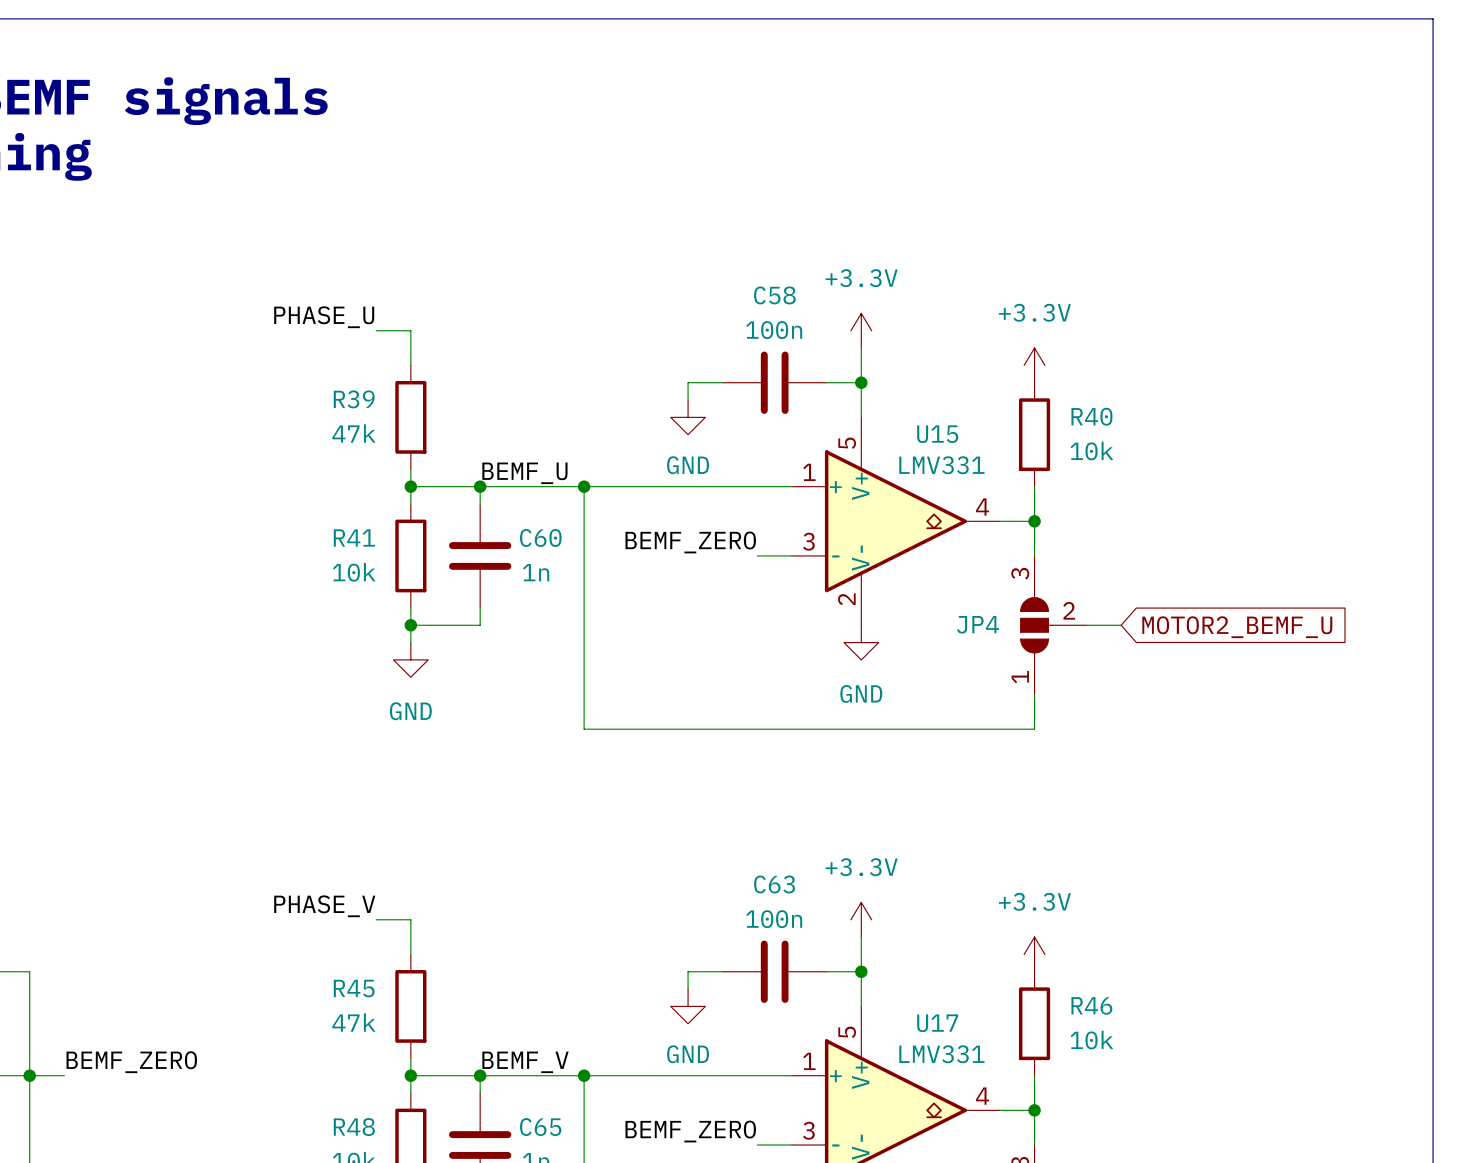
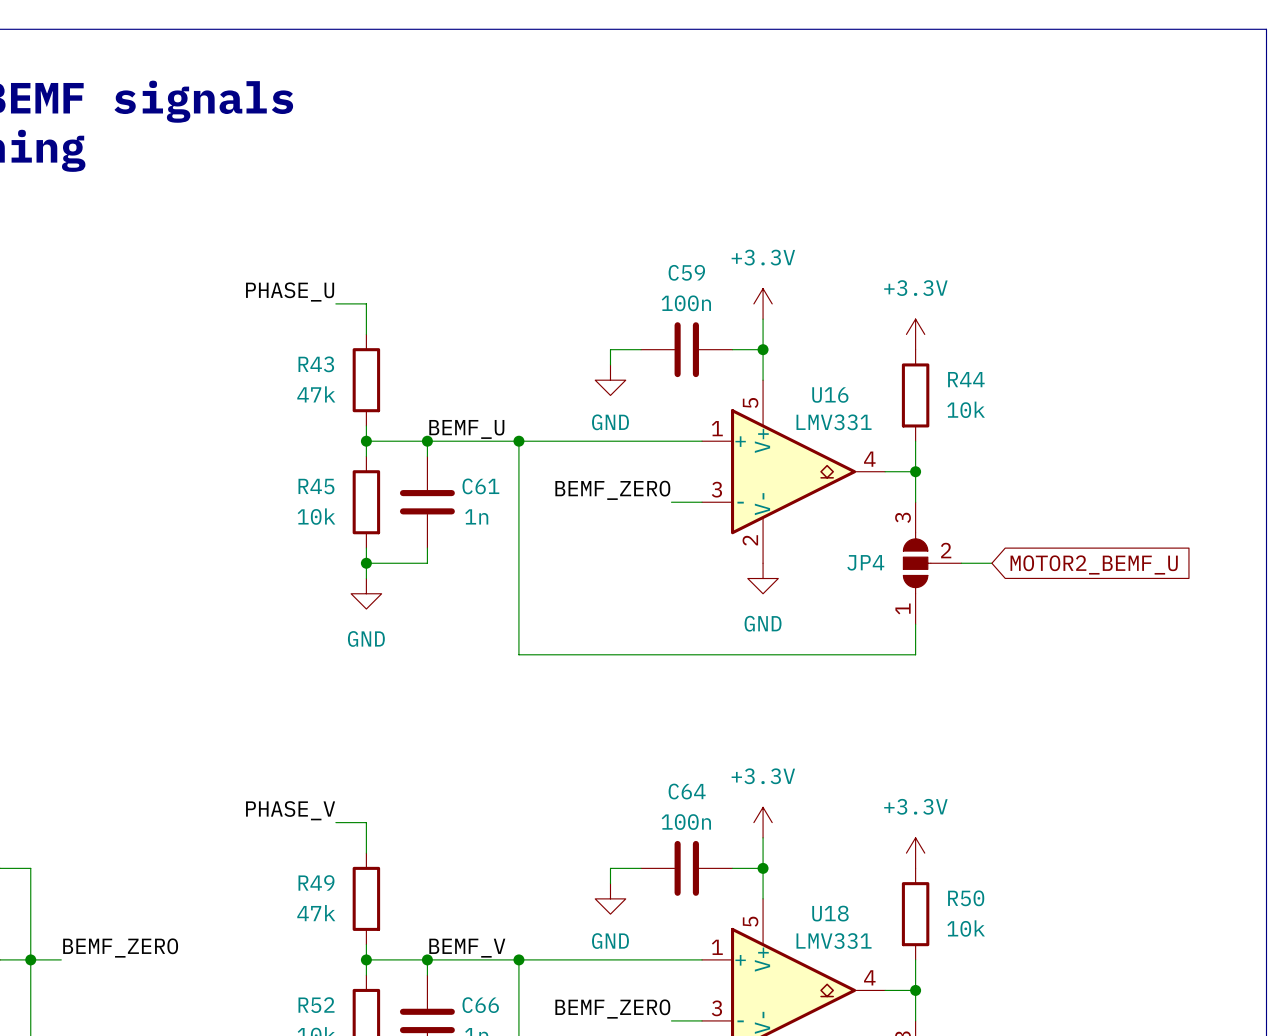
C58 name: C58 (774, 295) -> C59 (686, 272)
R39 name: R39 (354, 399) -> R43 (316, 364)
R40 name: R40 (1091, 416) -> R44 (966, 379)
U15 name: U15 (937, 434) -> U16 (830, 395)
R41 name: R41 (354, 537) -> R45 (316, 486)
C60 name: C60 (540, 537) -> C61 (480, 486)
C63 name: C63 (774, 884) -> C64 (687, 791)
R45 name: R45 (354, 988) -> R49 (316, 882)
R46 name: R46 (1091, 1005) -> R50 (966, 898)
U17 name: U17 (937, 1023) -> U18 (830, 913)
R48 name: R48 (354, 1127) -> R52 (316, 1005)
C65 name: C65 (540, 1127) -> C66 (480, 1005)

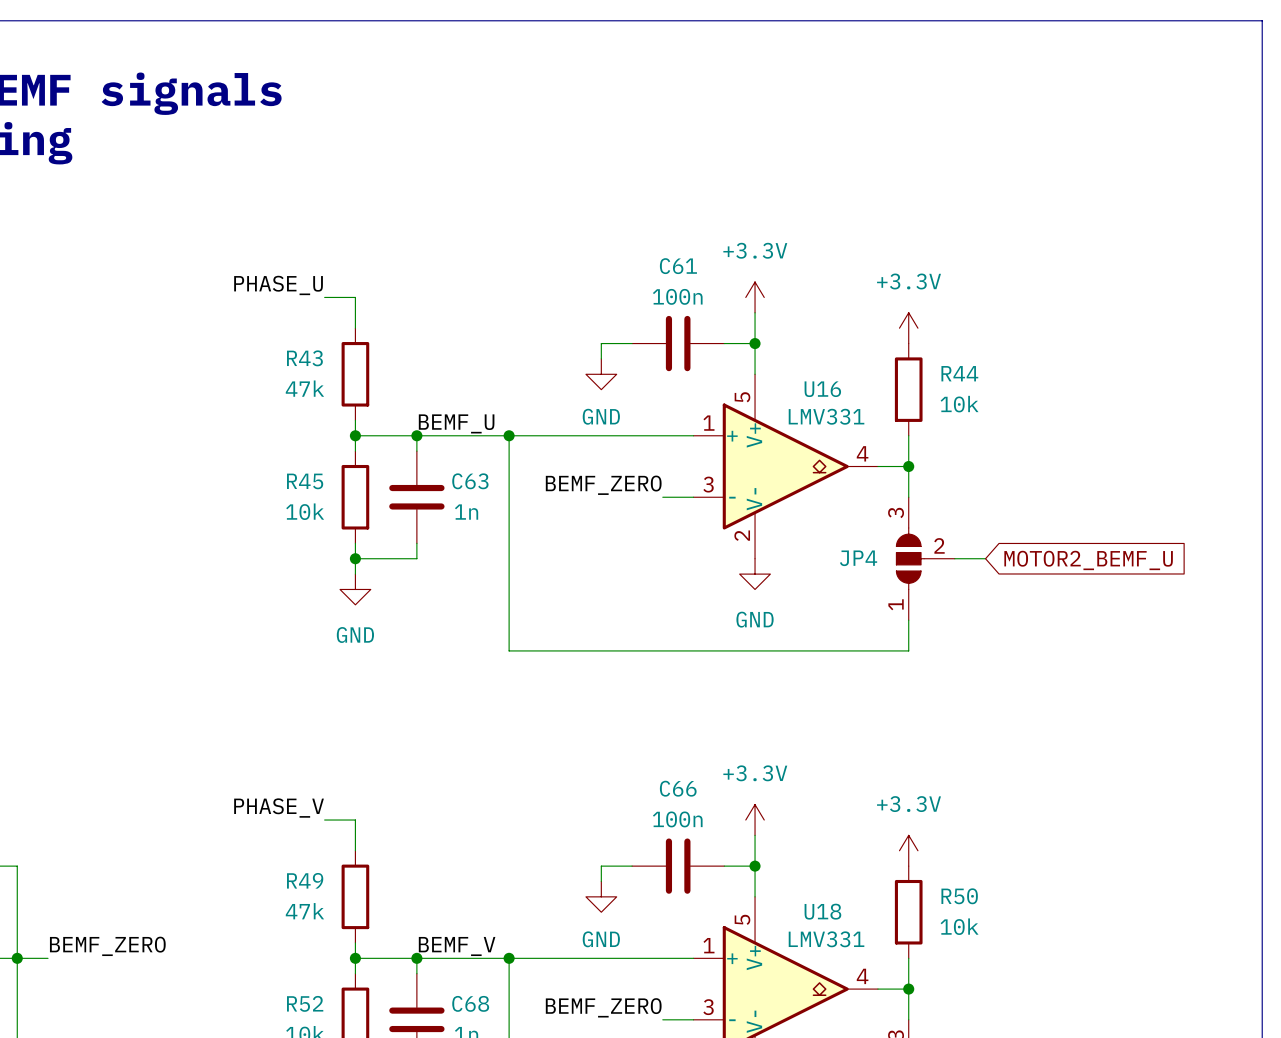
C59 name: C59 (686, 272) -> C61 (678, 266)
C61 name: C61 (480, 486) -> C63 (470, 481)
C64 name: C64 (687, 791) -> C66 (678, 788)
C66 name: C66 (480, 1005) -> C68 (470, 1003)

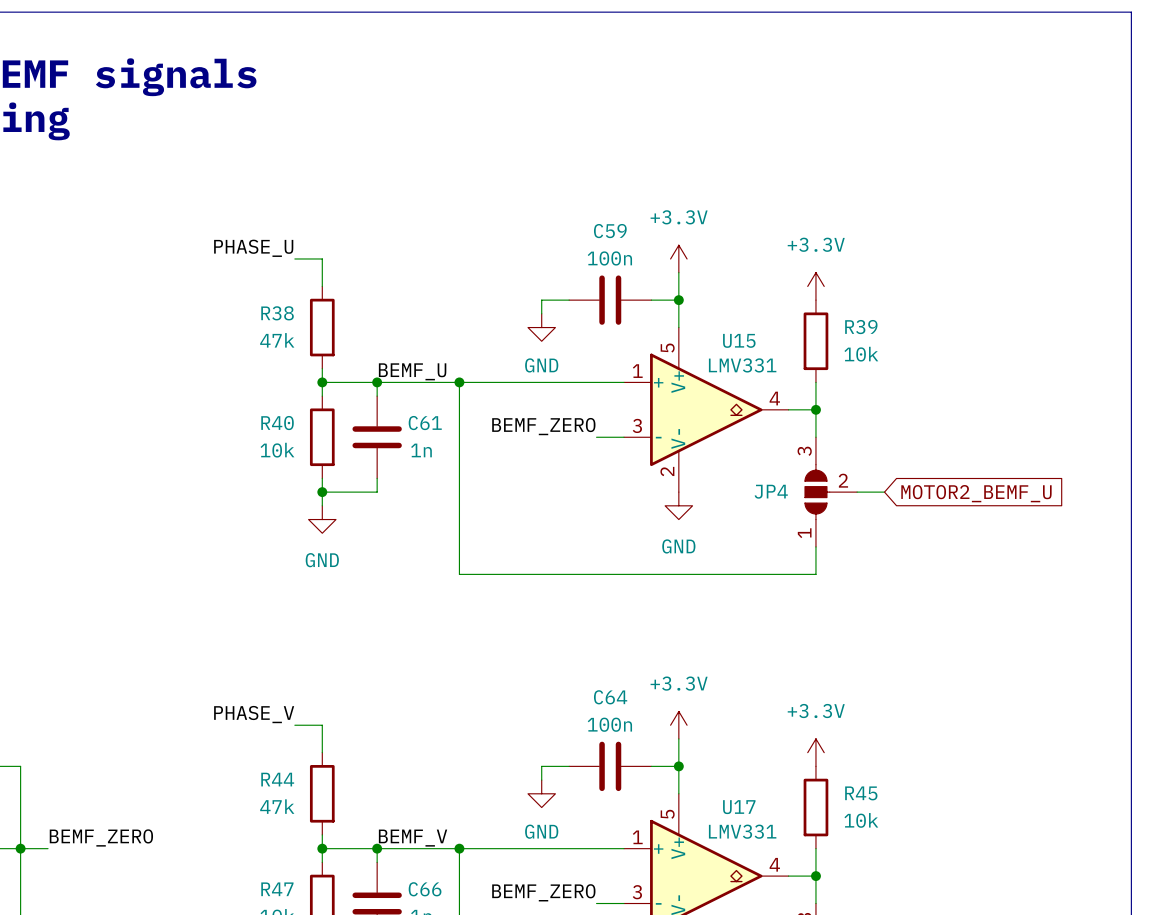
C61 name: C61 (678, 266) -> C59 (610, 231)
R43 name: R43 (304, 358) -> R38 (277, 313)
R44 name: R44 (959, 373) -> R39 (861, 327)
U16 name: U16 (822, 389) -> U15 (739, 340)
R45 name: R45 (305, 481) -> R40 (277, 423)
C63 name: C63 (470, 481) -> C61 (425, 423)
C66 name: C66 (678, 788) -> C64 (610, 697)
R49 name: R49 (305, 880) -> R44 (277, 779)
R50 name: R50 (959, 896) -> R45 (861, 793)
U18 name: U18 (822, 911) -> U17 (739, 807)
R52 name: R52 (305, 1003) -> R47 (277, 889)
C68 name: C68 (470, 1003) -> C66 (425, 889)

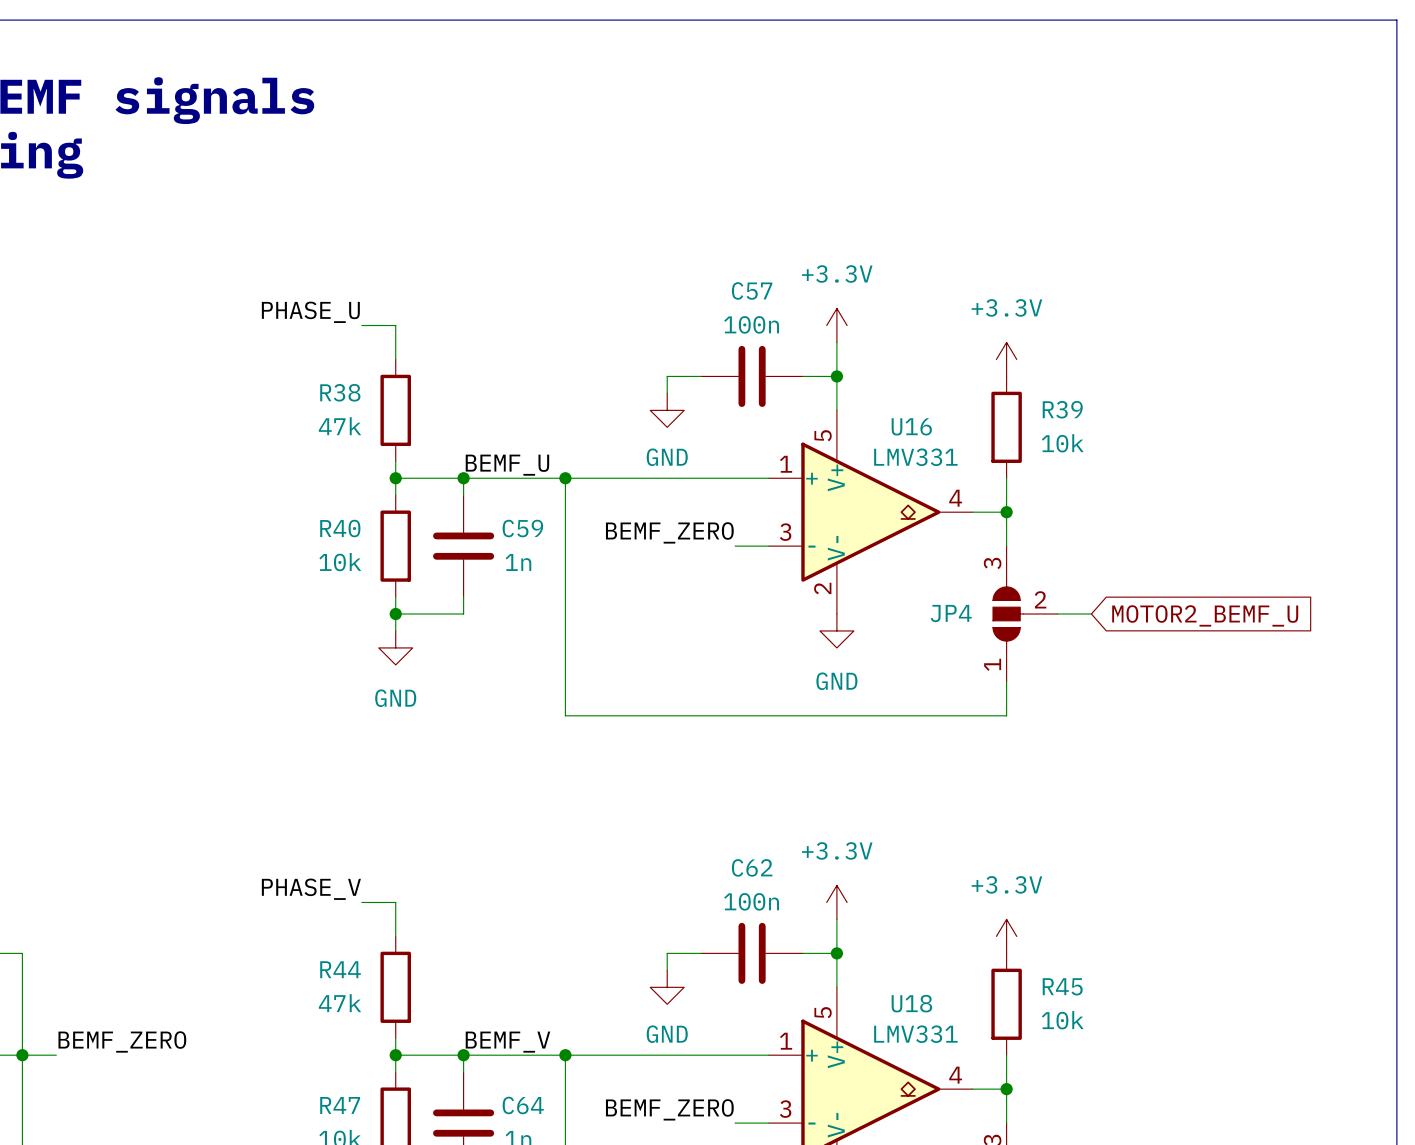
C59 name: C59 (610, 231) -> C57 (752, 290)
U15 name: U15 (739, 340) -> U16 (911, 426)
C61 name: C61 (425, 423) -> C59 (522, 528)
C64 name: C64 (610, 697) -> C62 (752, 867)
U17 name: U17 (739, 807) -> U18 (911, 1003)
C66 name: C66 (425, 889) -> C64 (523, 1105)

